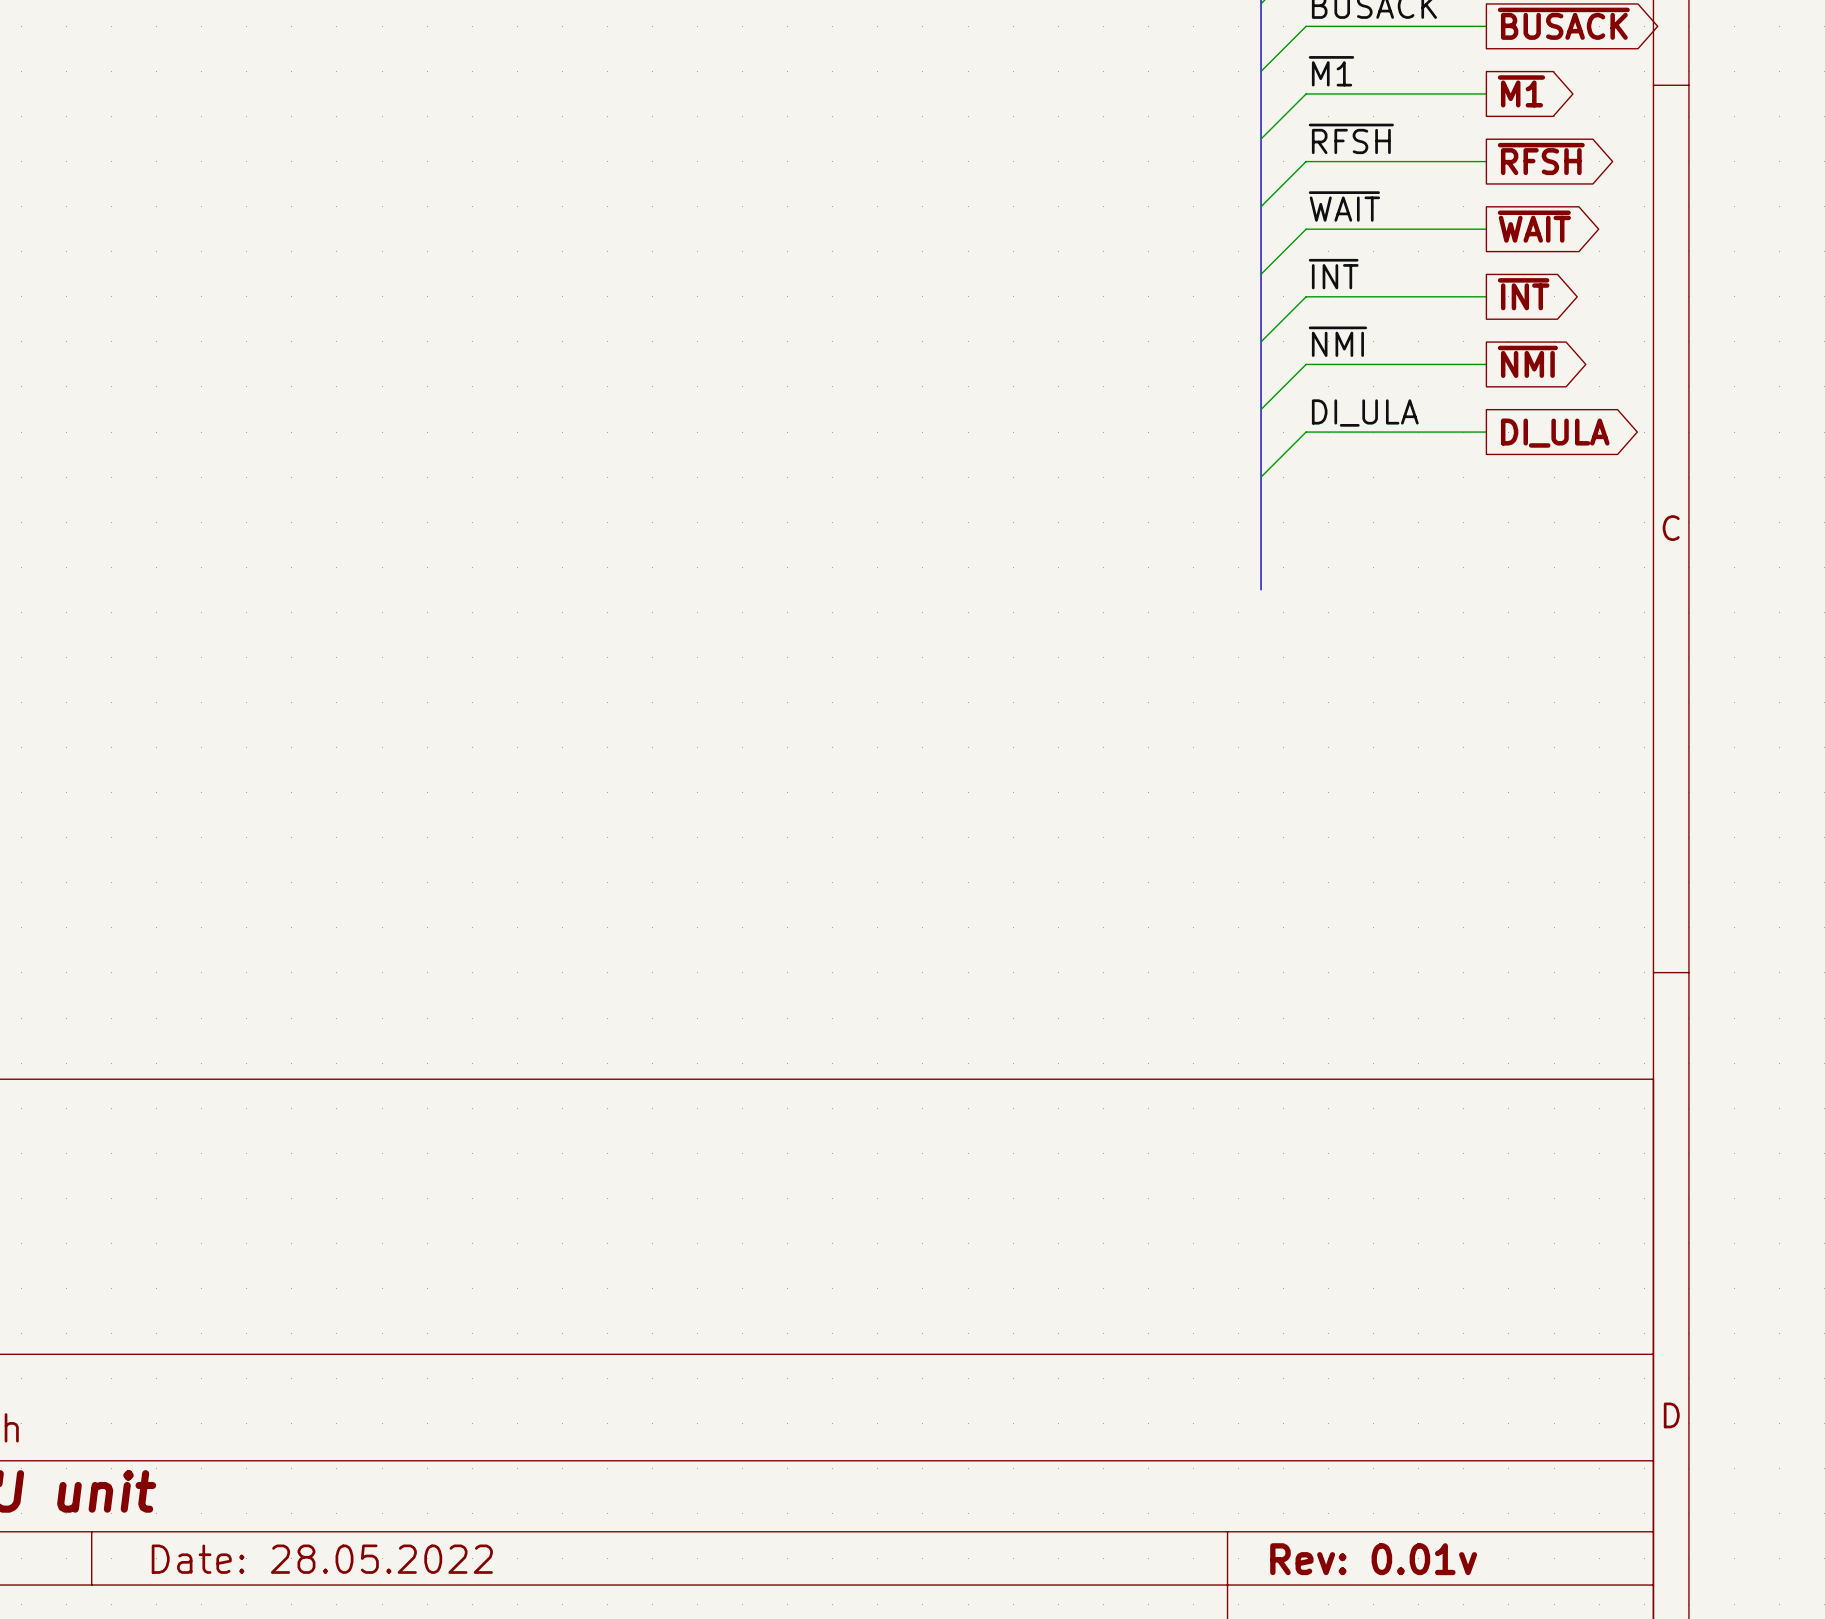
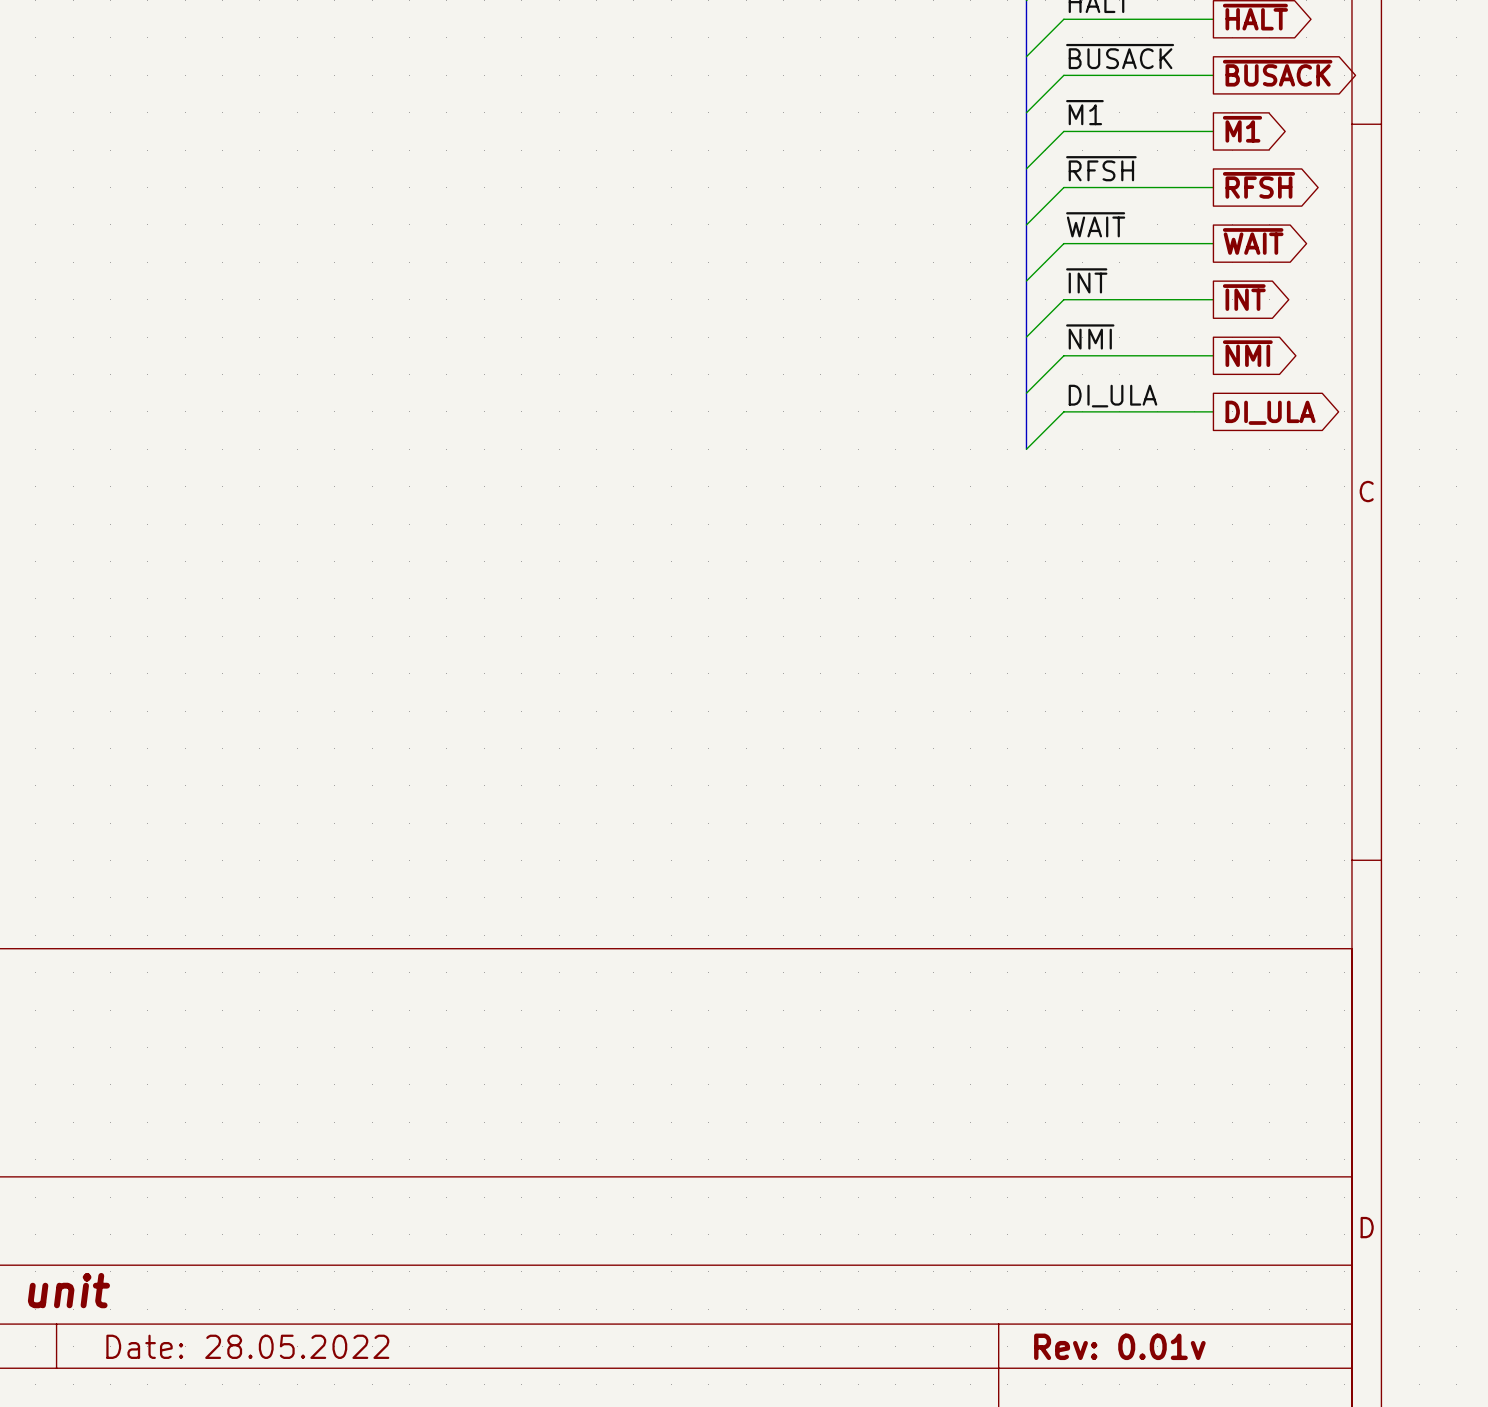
bus: (1261, 477) (1261, 589) -> none

